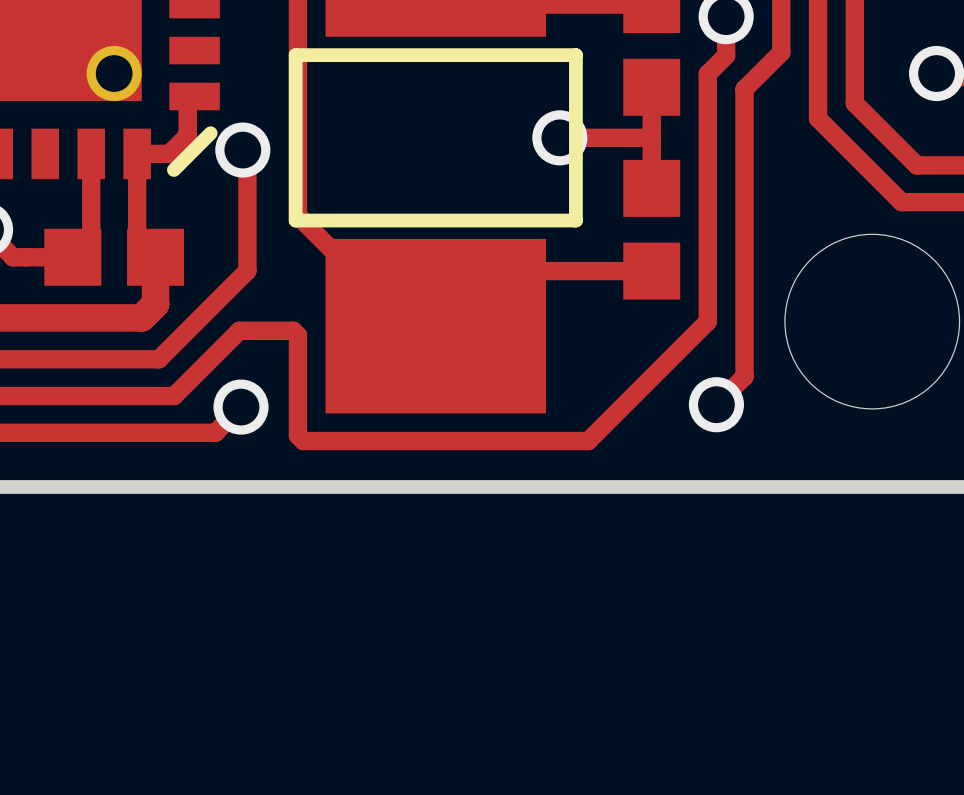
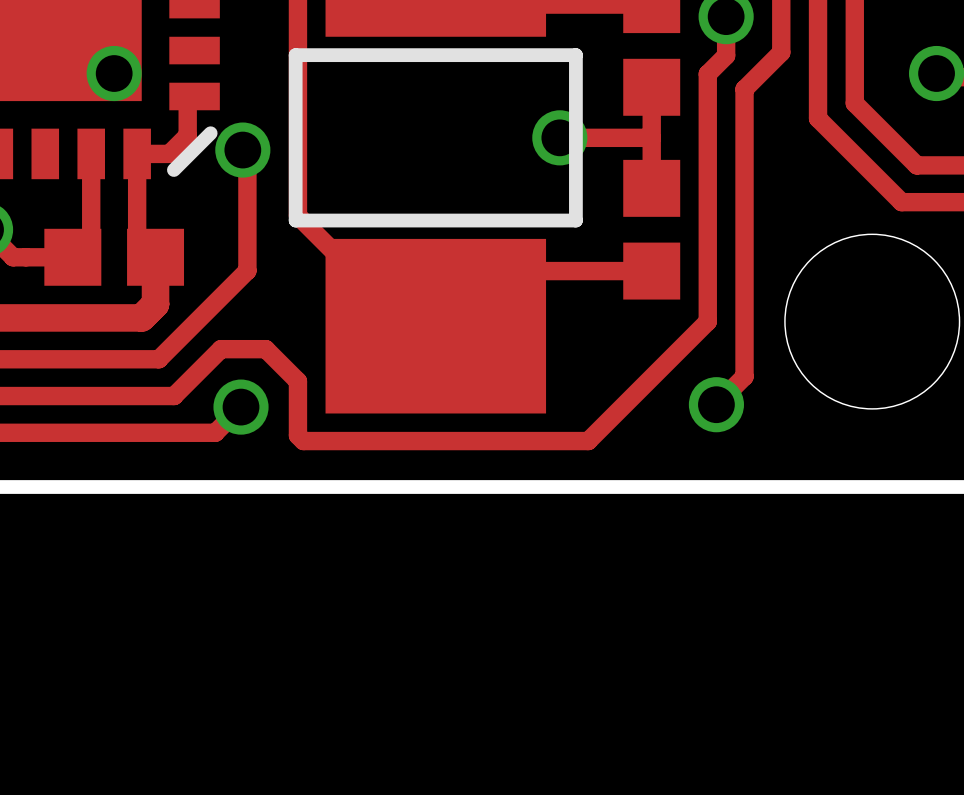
track: (220, 349) (239, 330) (293, 330) (297, 335) (297, 381) -> (220, 349) (265, 349) (297, 381)

